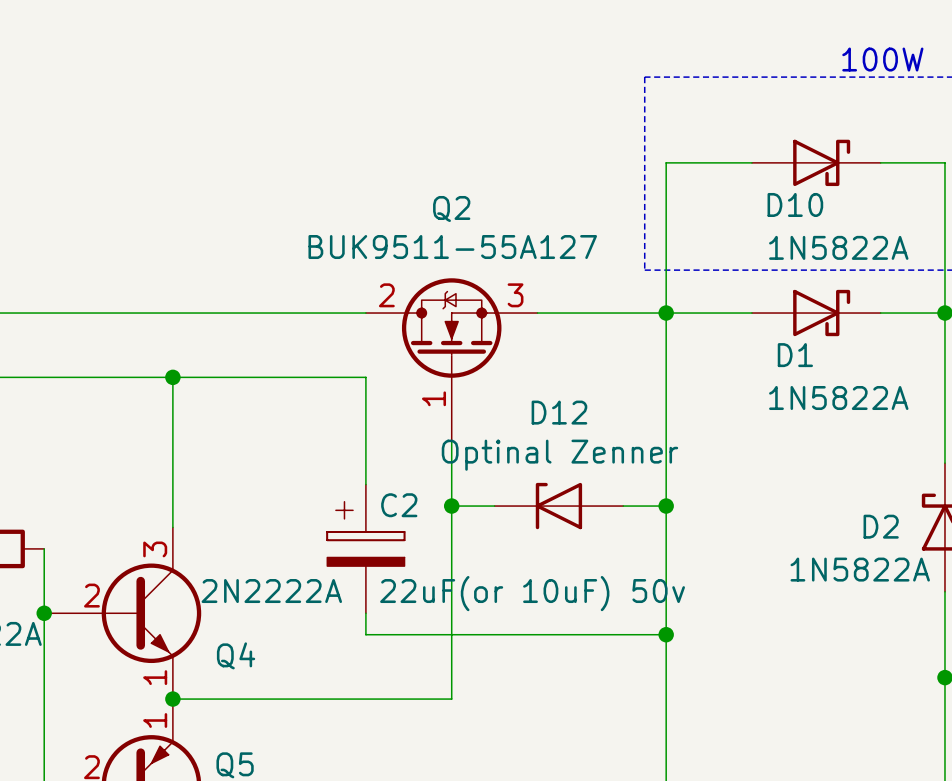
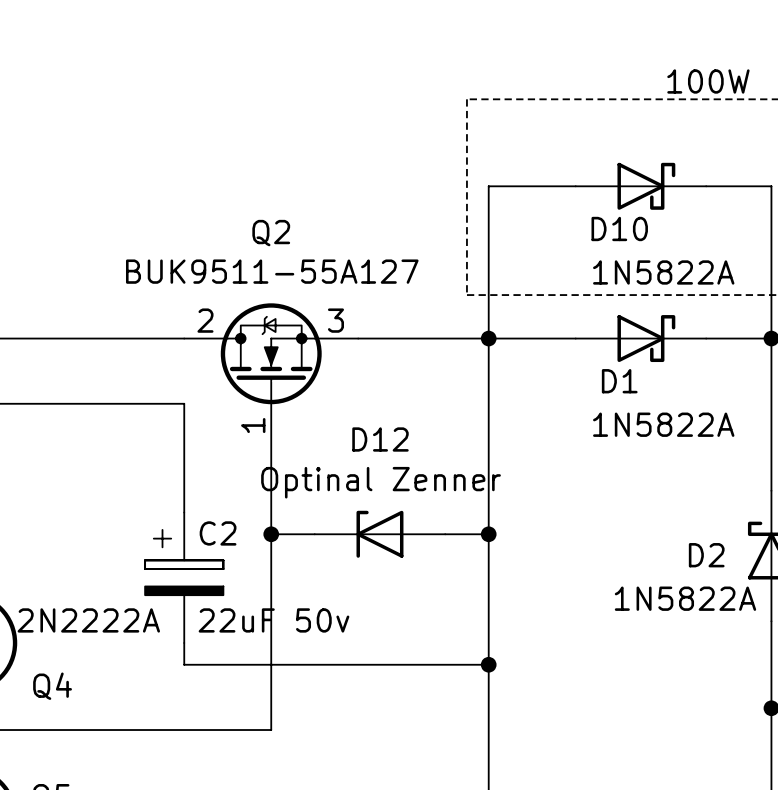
C2 value: 22uF(or 10uF) 50v (532, 593) -> 22uF 50v (273, 620)

